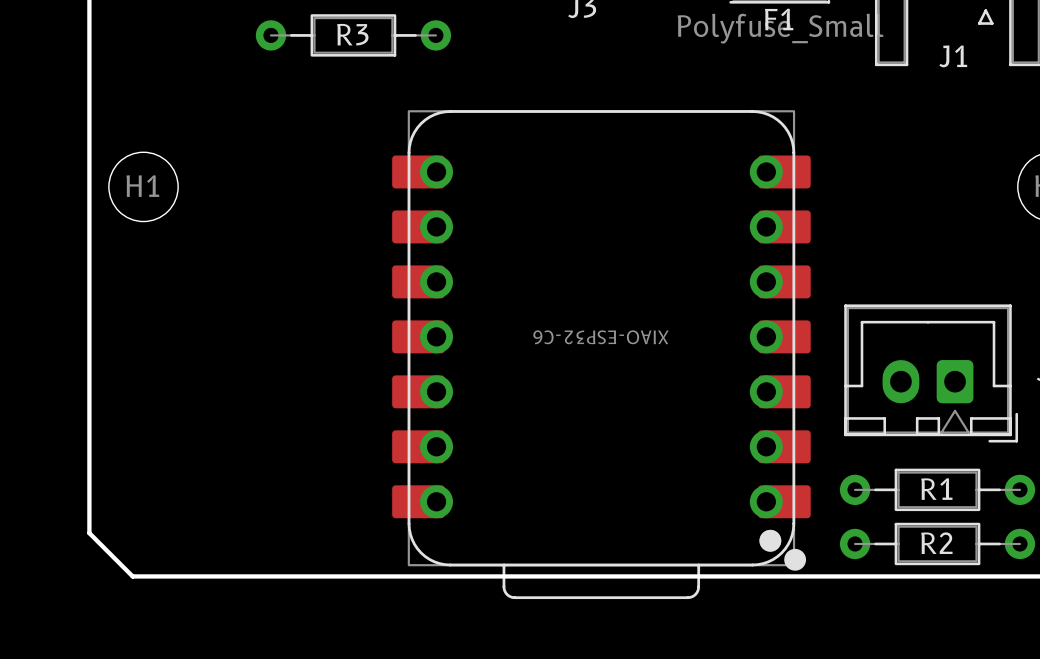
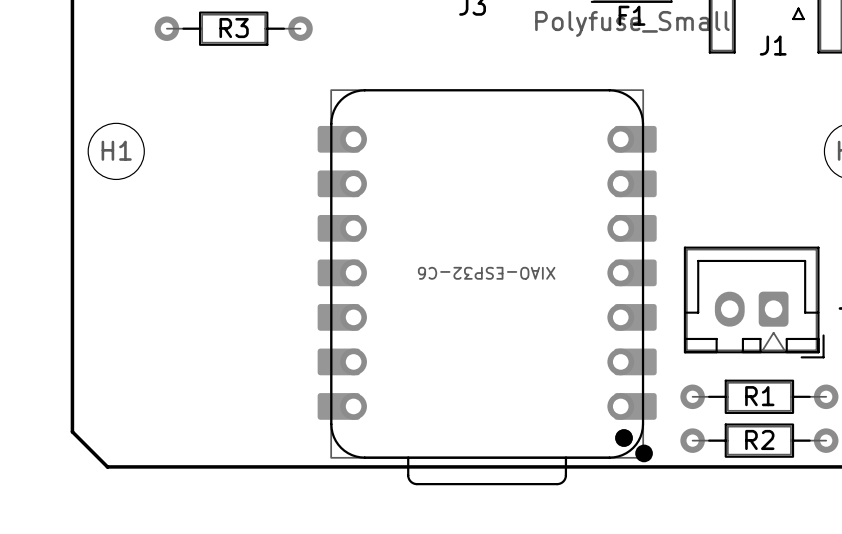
R3 position: (353, 35) -> (233, 28)

